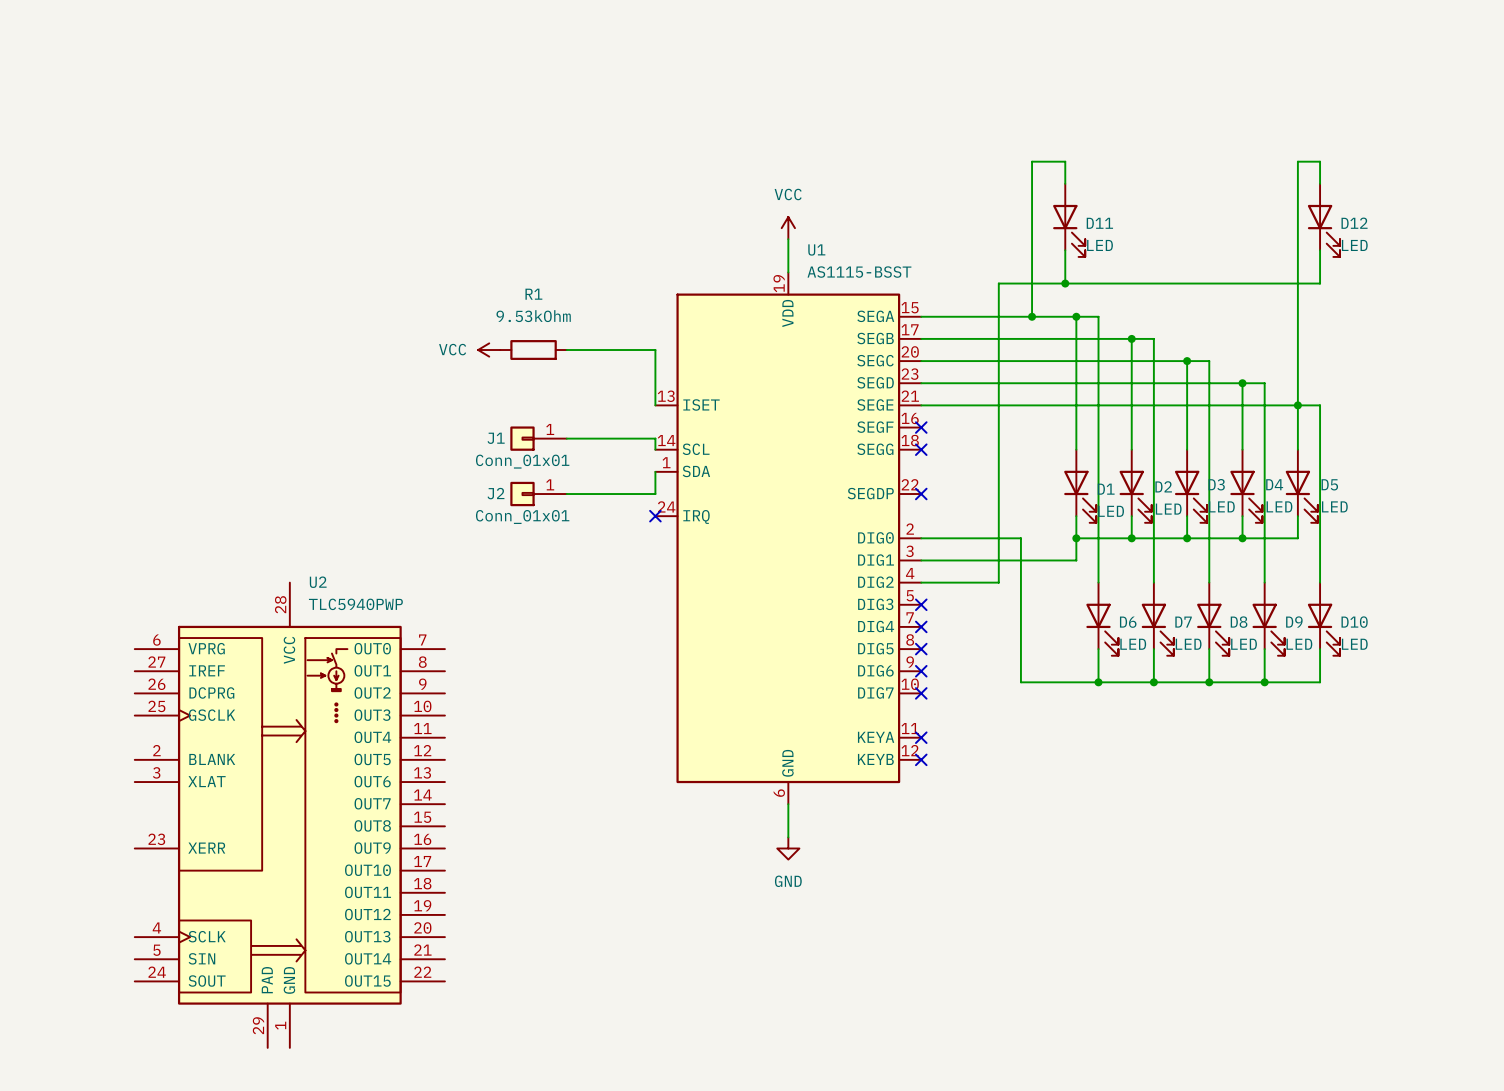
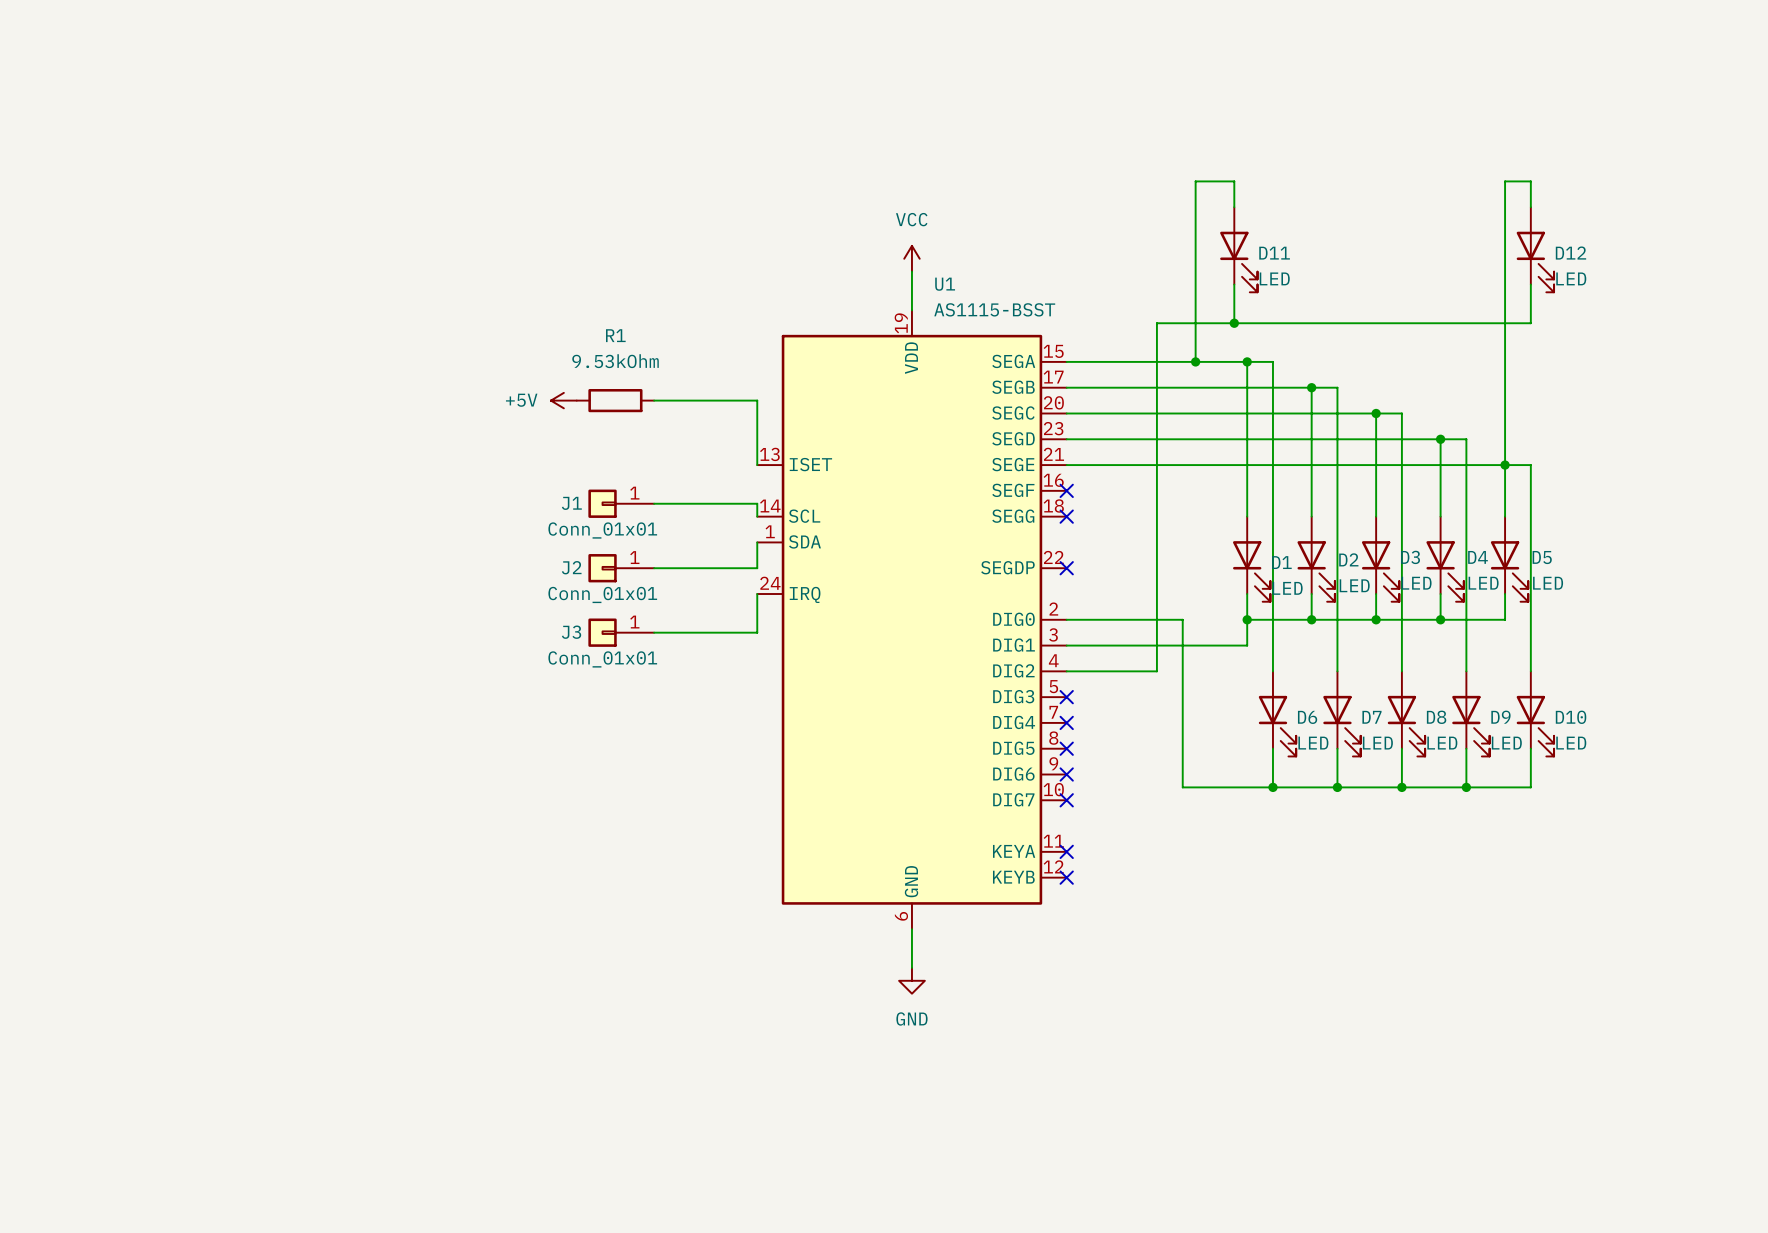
power symbol: VCC (489, 350) -> +5V (563, 400)
wire: none -> (757, 594) (757, 632) (654, 632)
no-connect mark: (655, 516) -> none
J3: none -> Conn_01x01 (621, 632)
U2: TLC5940PWP (289, 815) -> none

